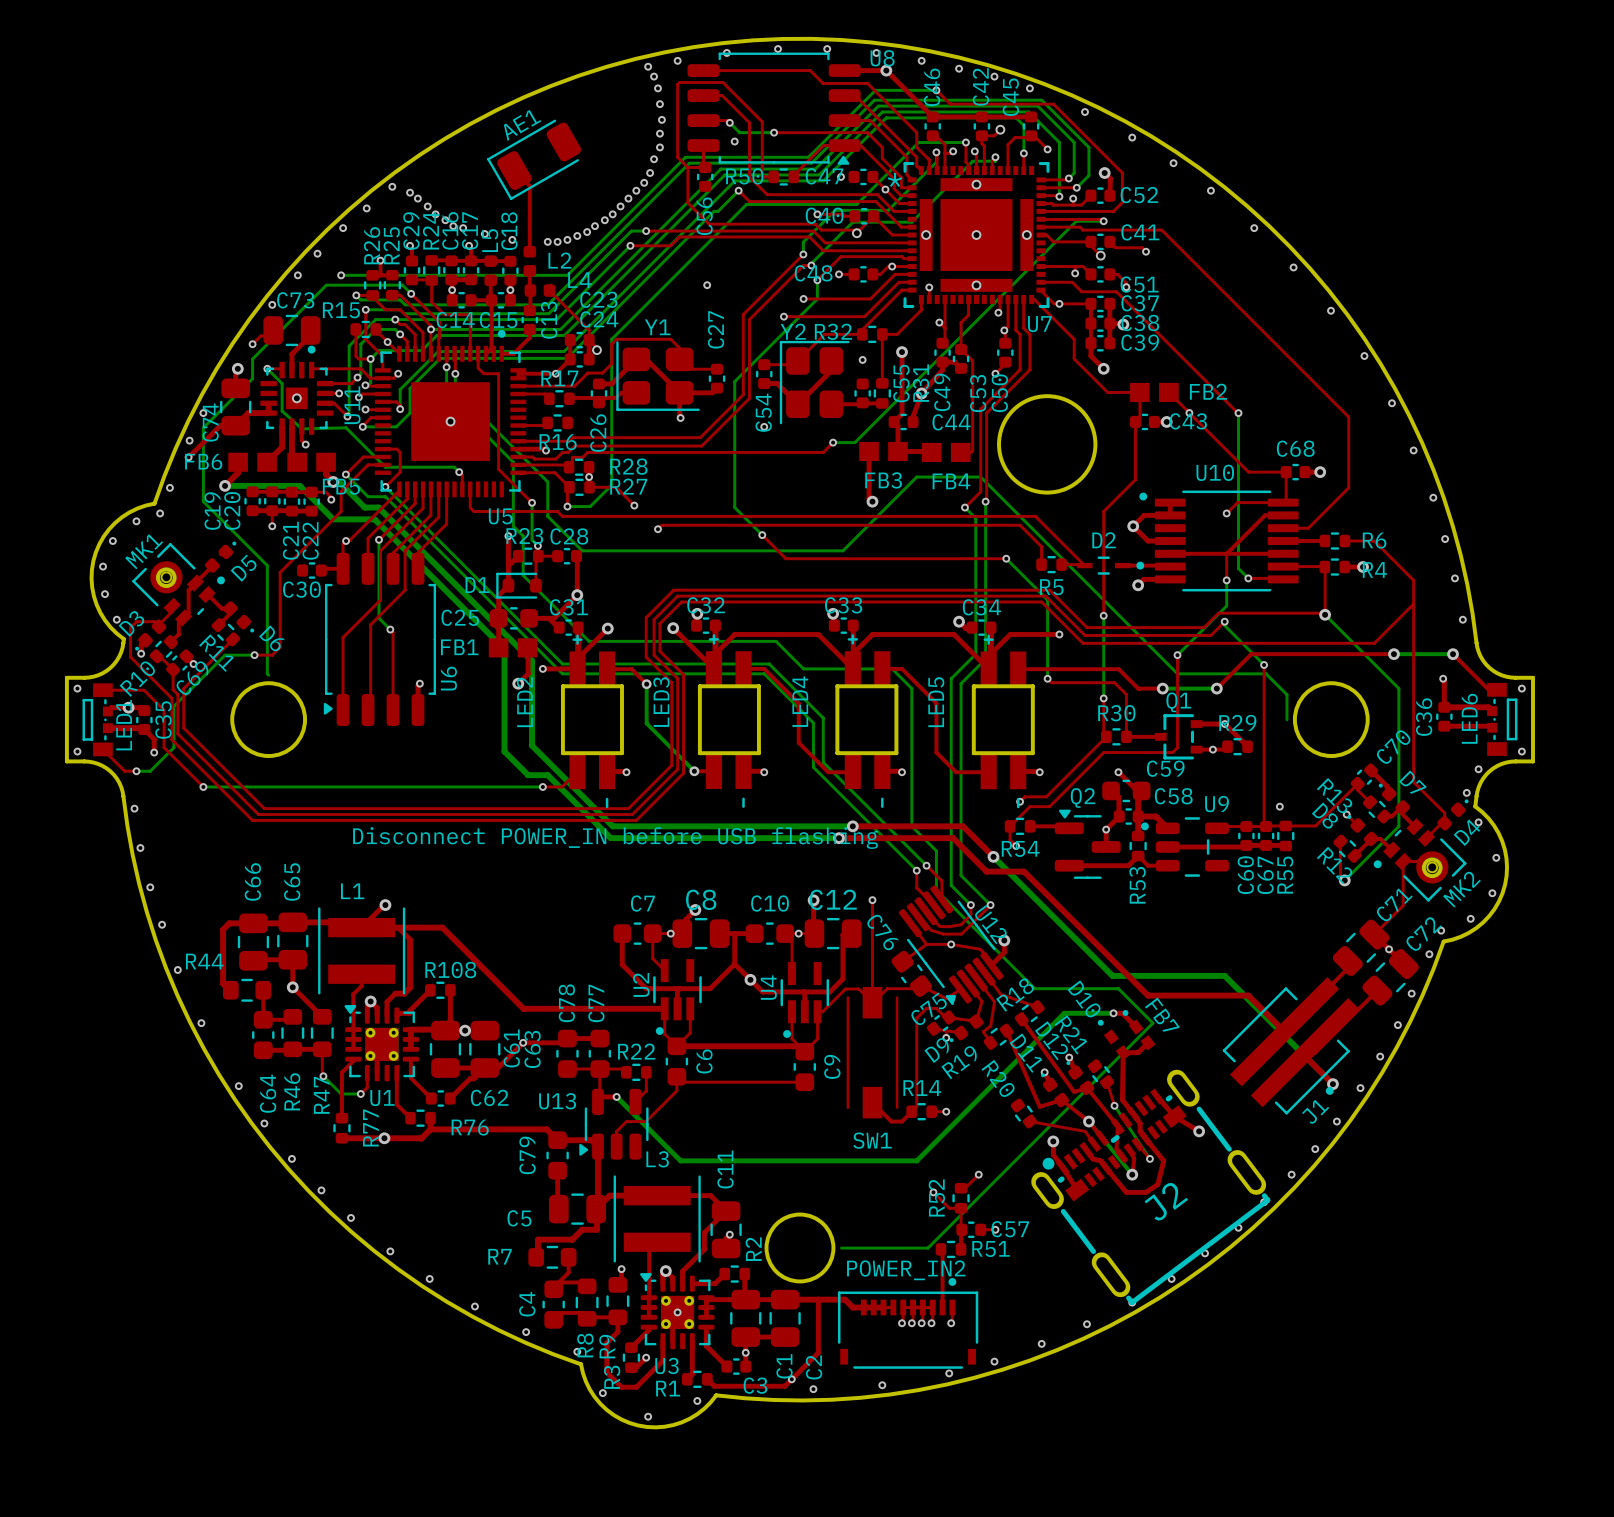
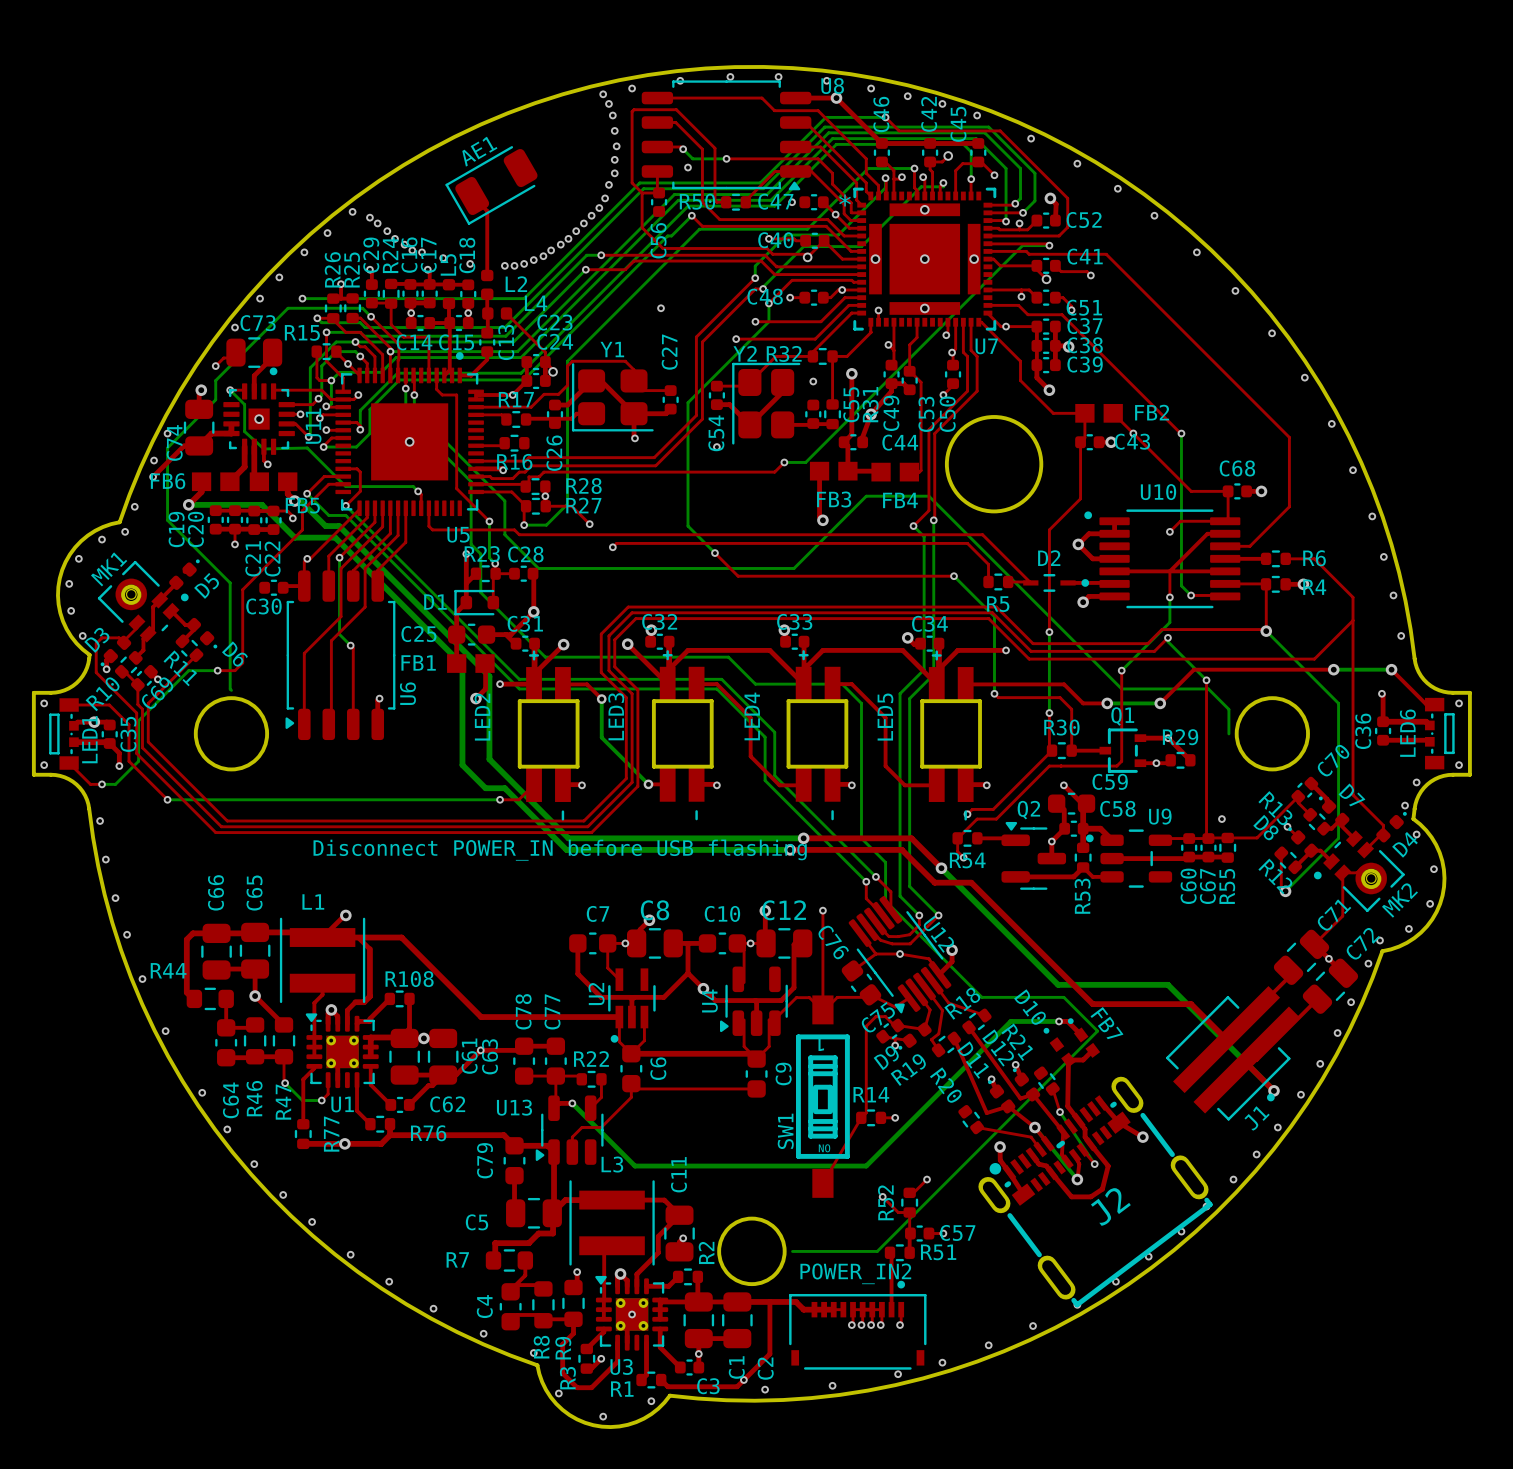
U4 footprint: [780, 962, 830, 1038] -> [720, 966, 788, 1036]
SW1 footprint: [846, 986, 899, 1119] -> [796, 995, 850, 1198]
top track: (872, 1102) (891, 1121) (901, 1121) (911, 1111) -> (822, 1183) (861, 1117)
SW1 name position: SW1 (872, 1140) -> SW1 (785, 1131)

